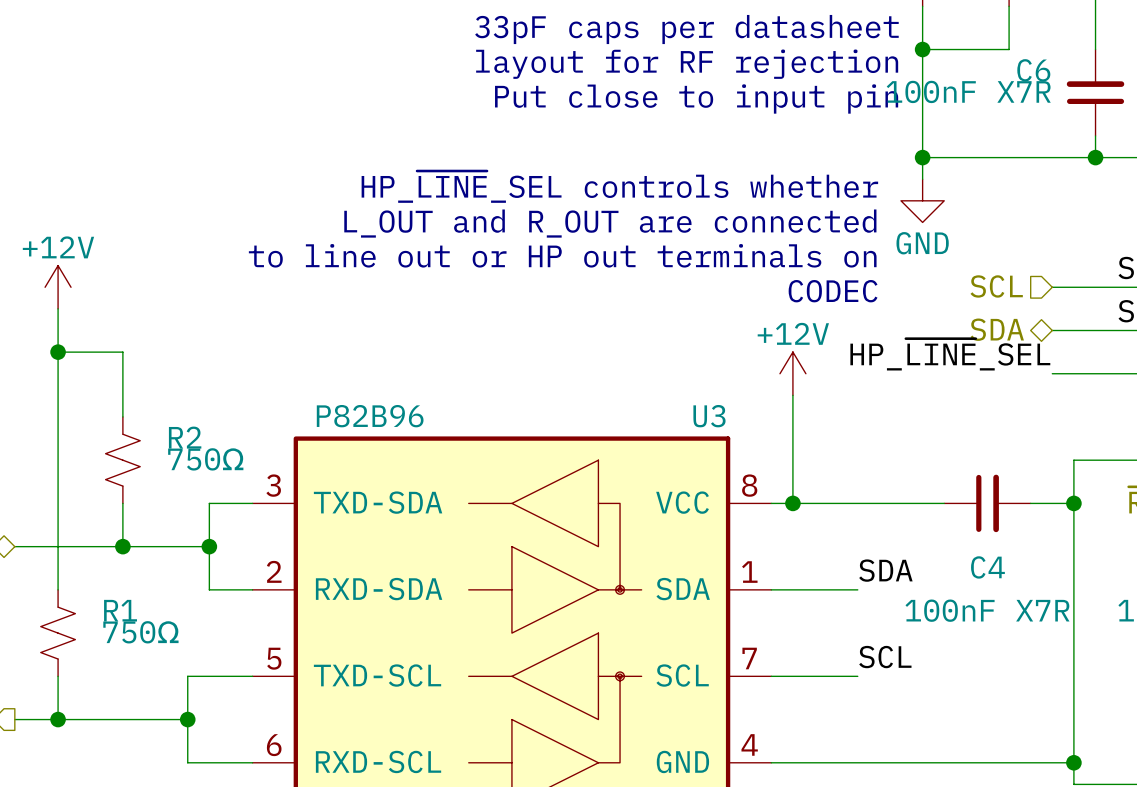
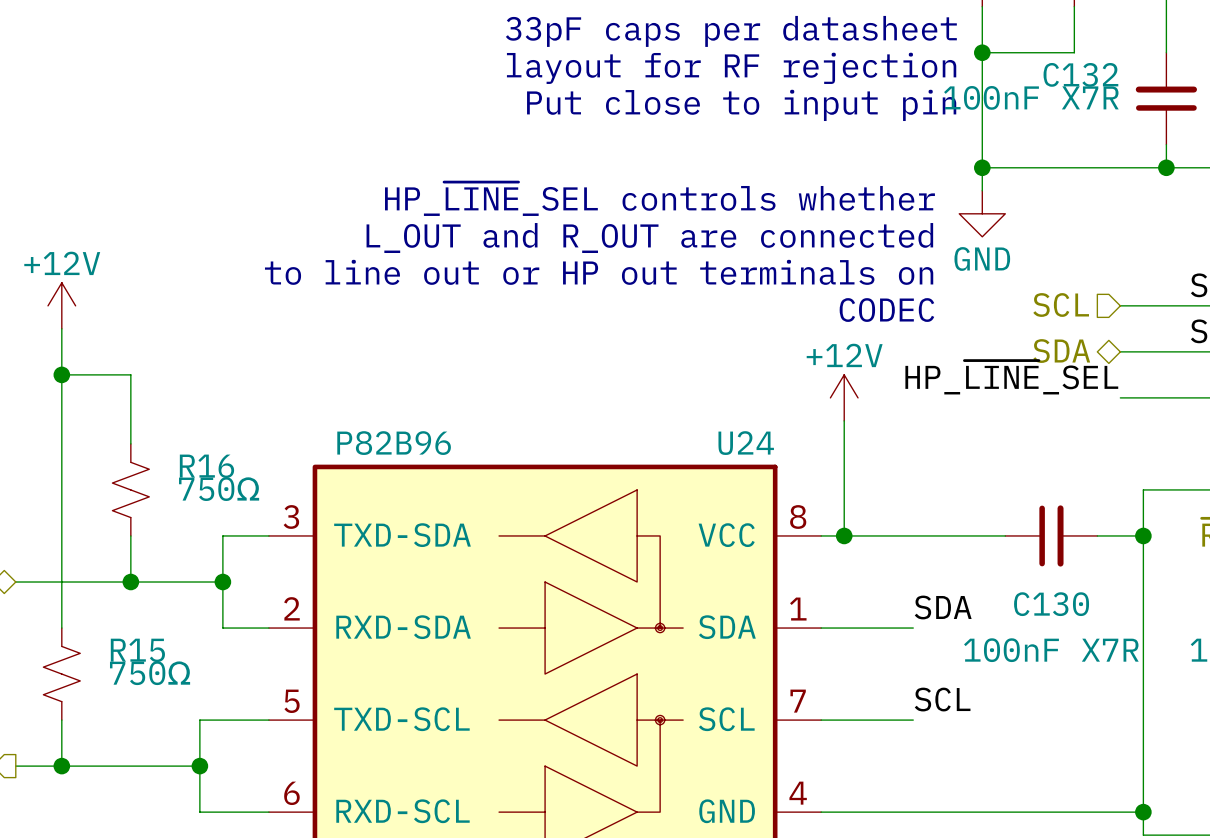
C6 name: C6 (1033, 70) -> C132 (1080, 74)
U3 name: U3 (709, 416) -> U24 (746, 443)
R2 name: R2 (185, 437) -> R16 (206, 466)
C4 name: C4 (987, 567) -> C130 (1051, 604)
R1 name: R1 (120, 610) -> R15 (137, 650)

